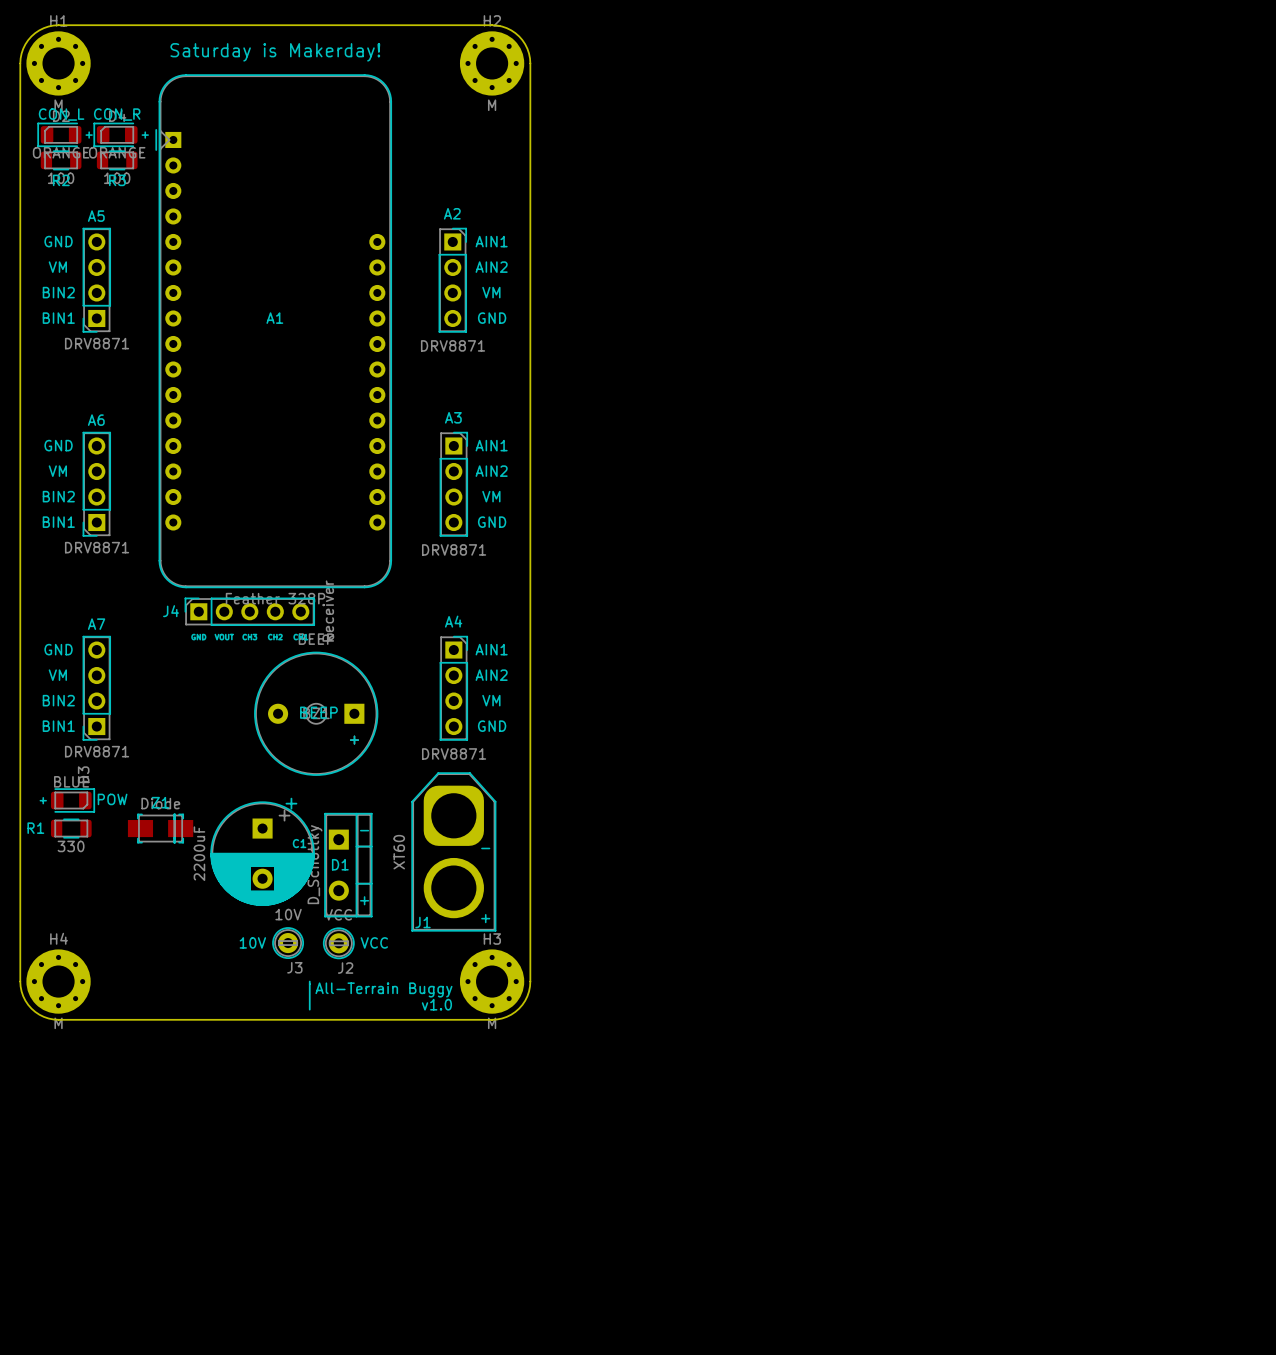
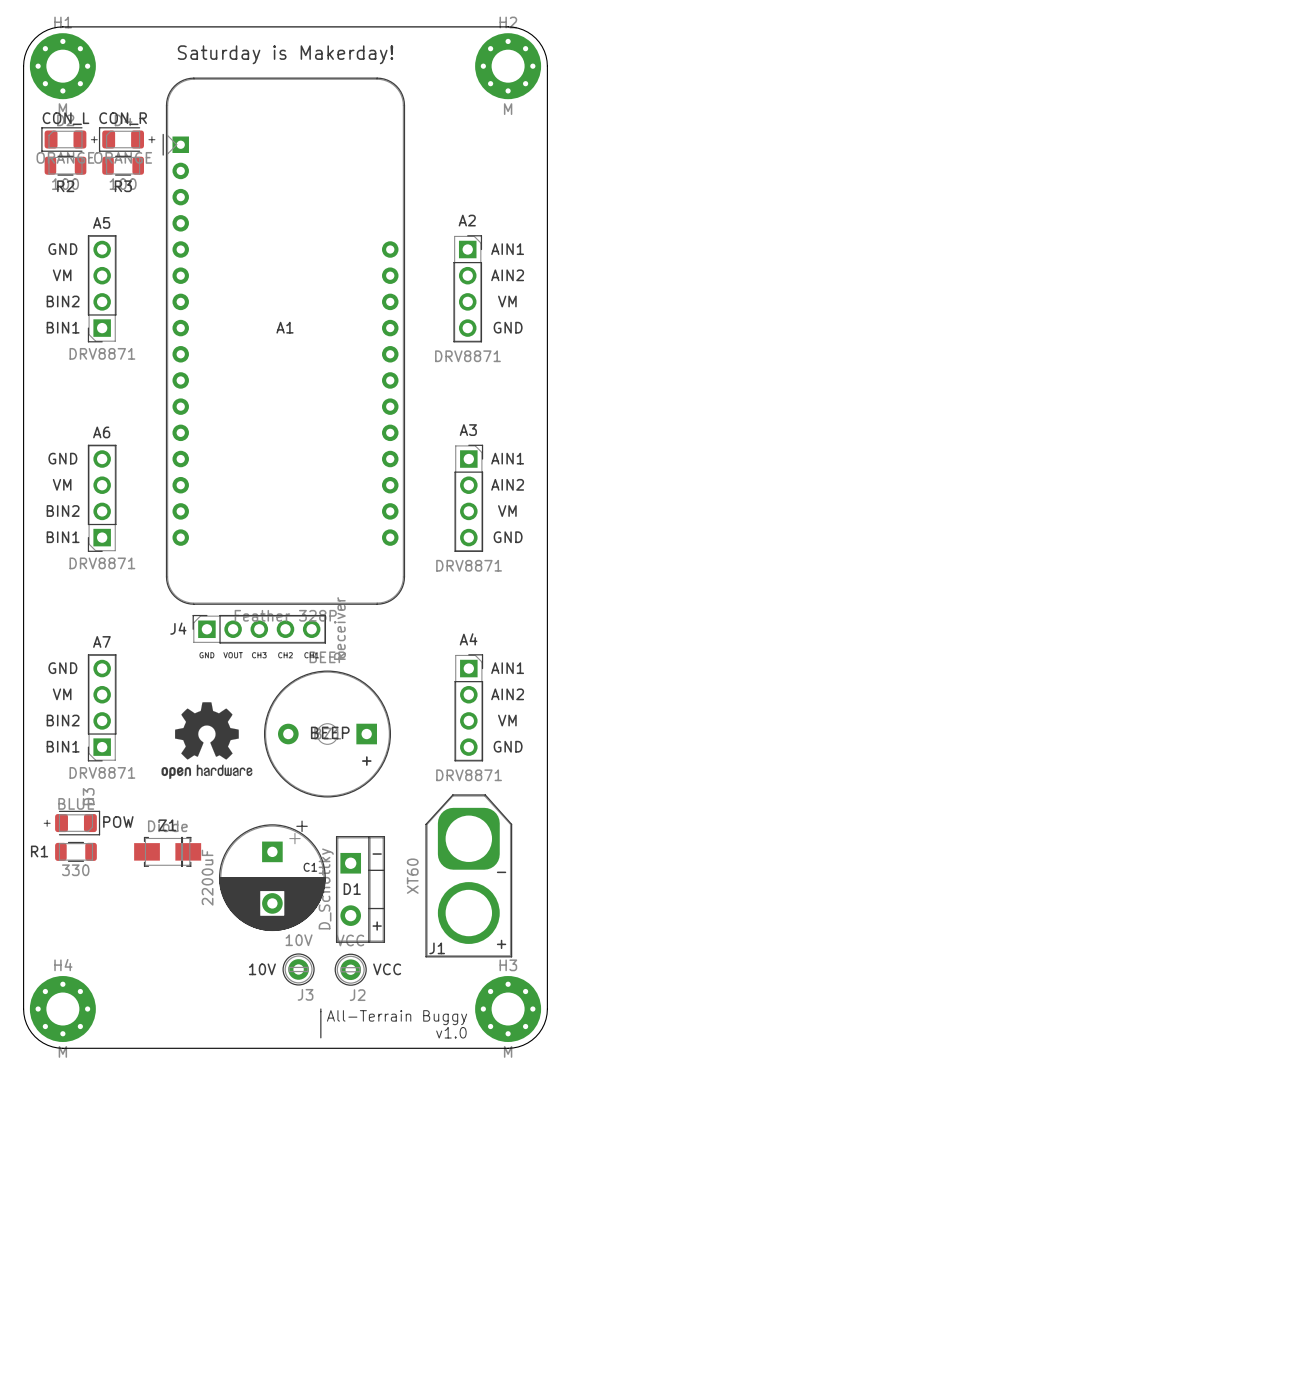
drawing: none -> [161, 702, 253, 780]

